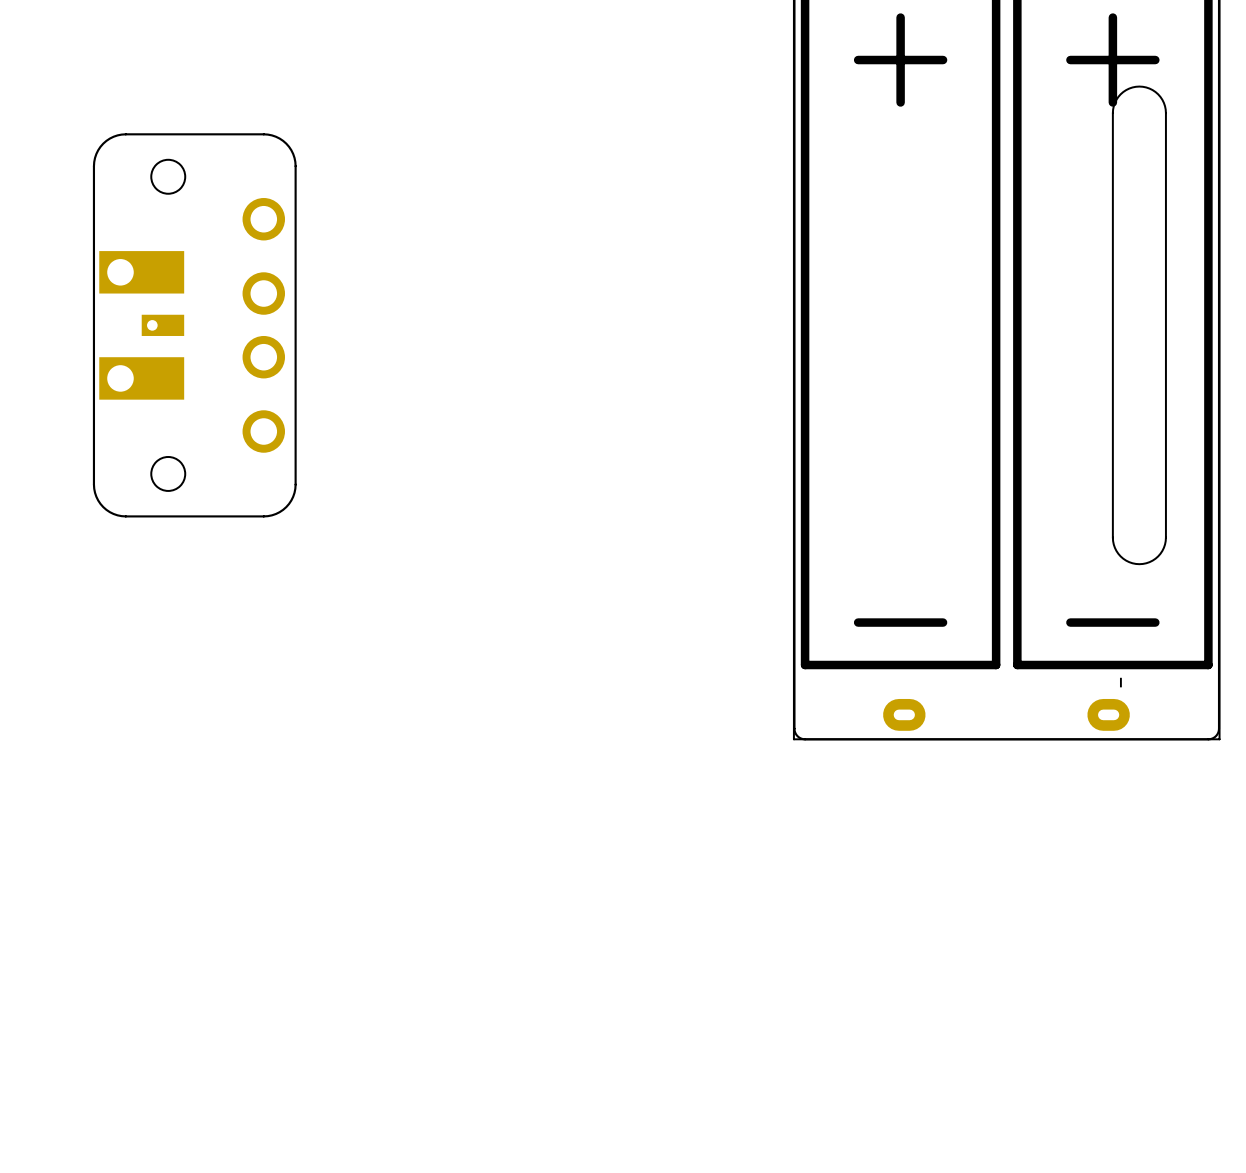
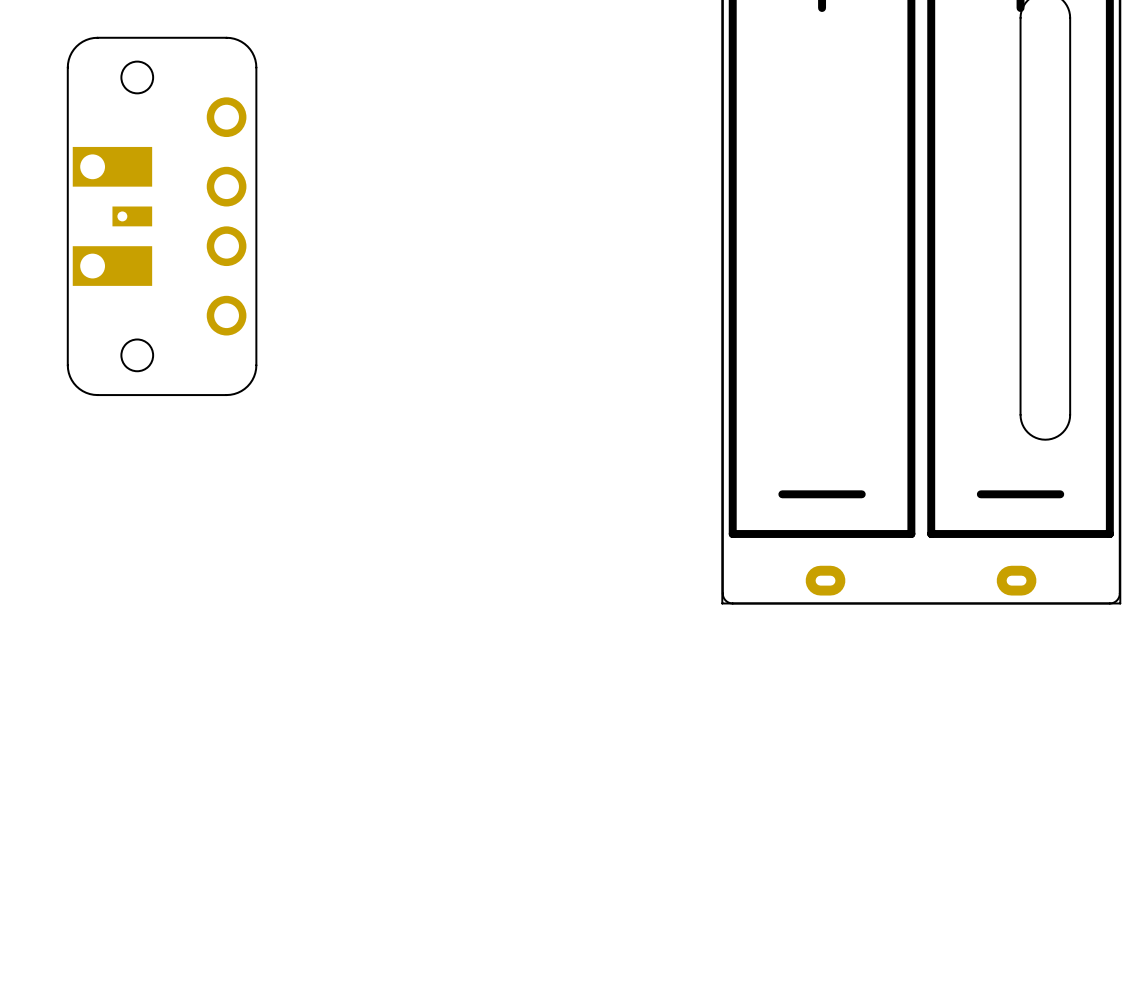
part text: - (1120, 682) -> none

